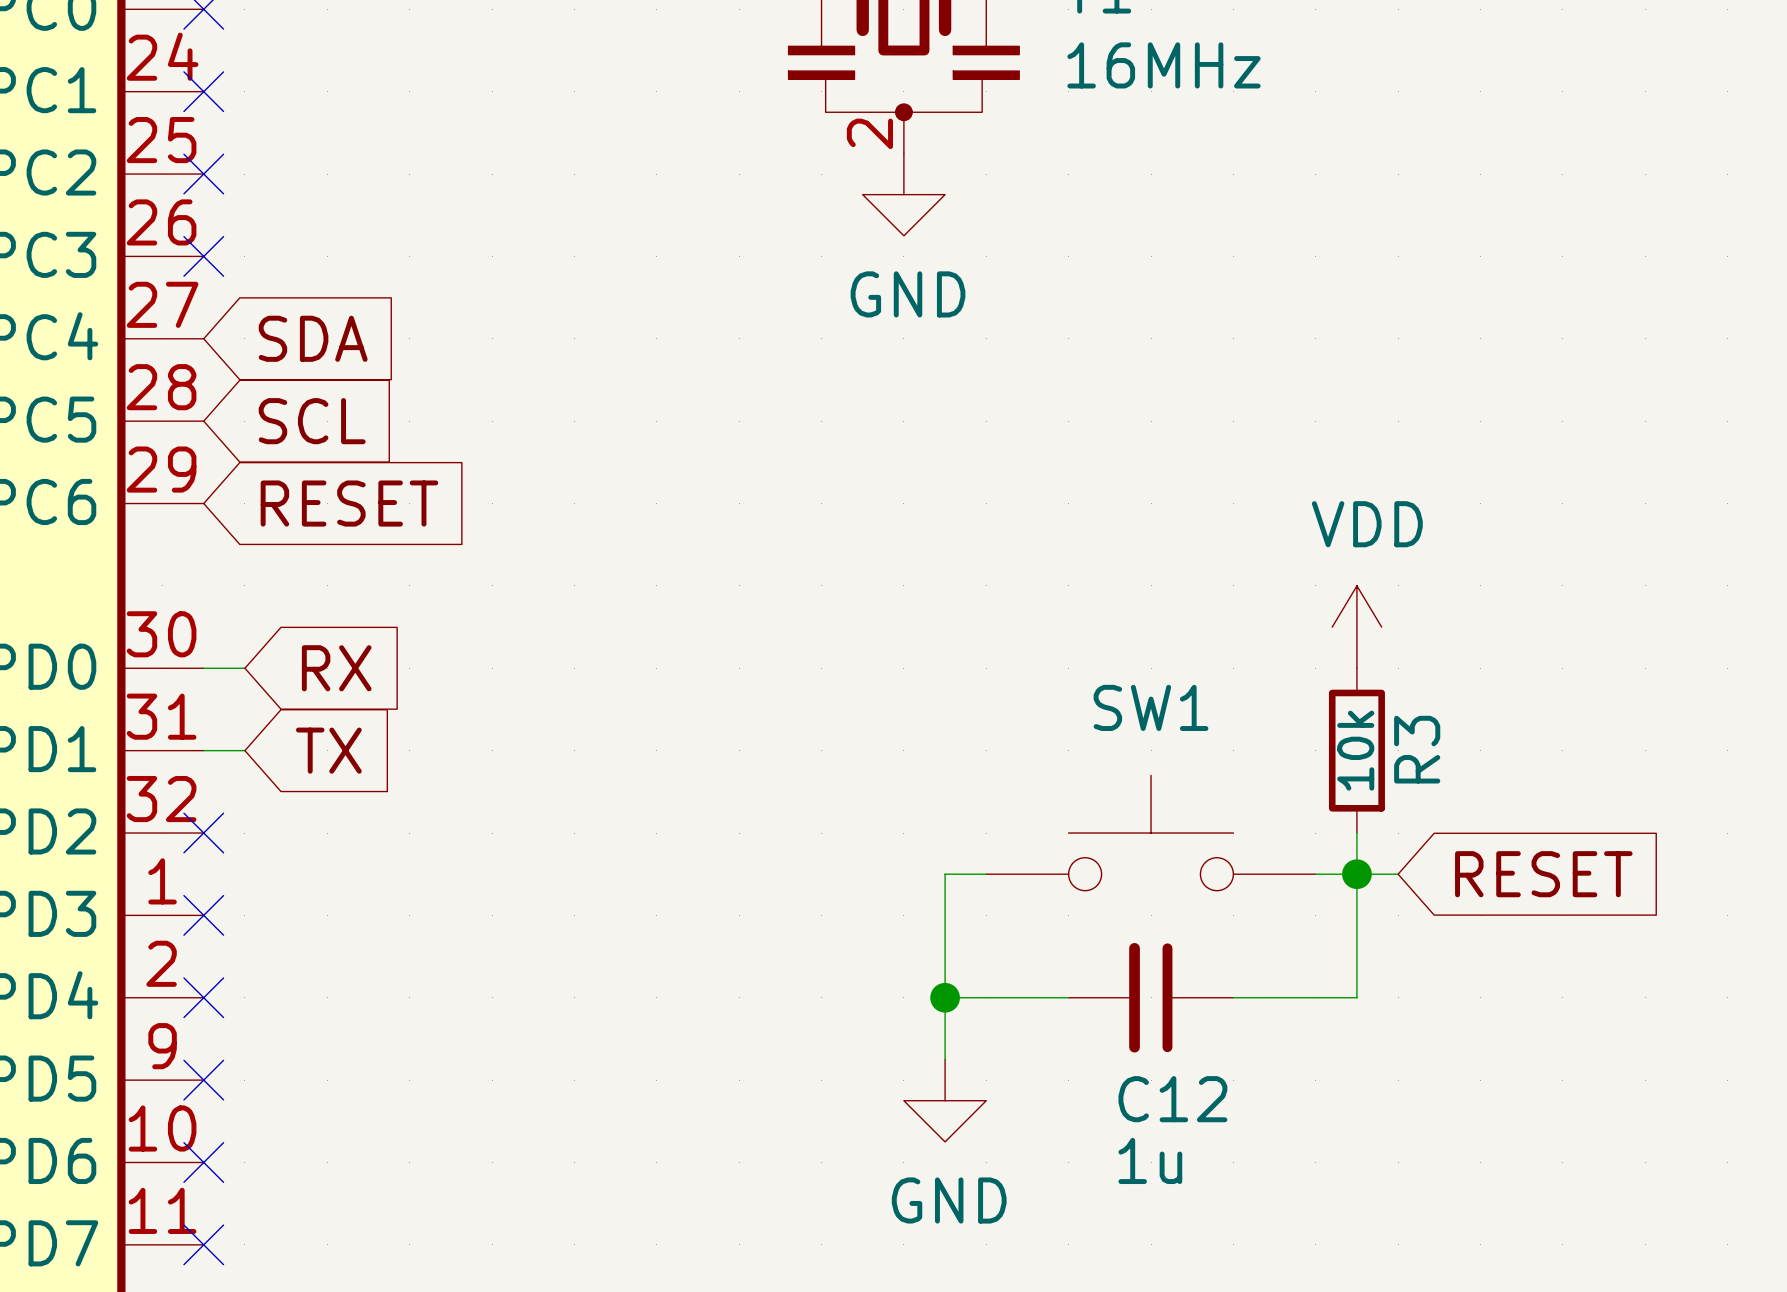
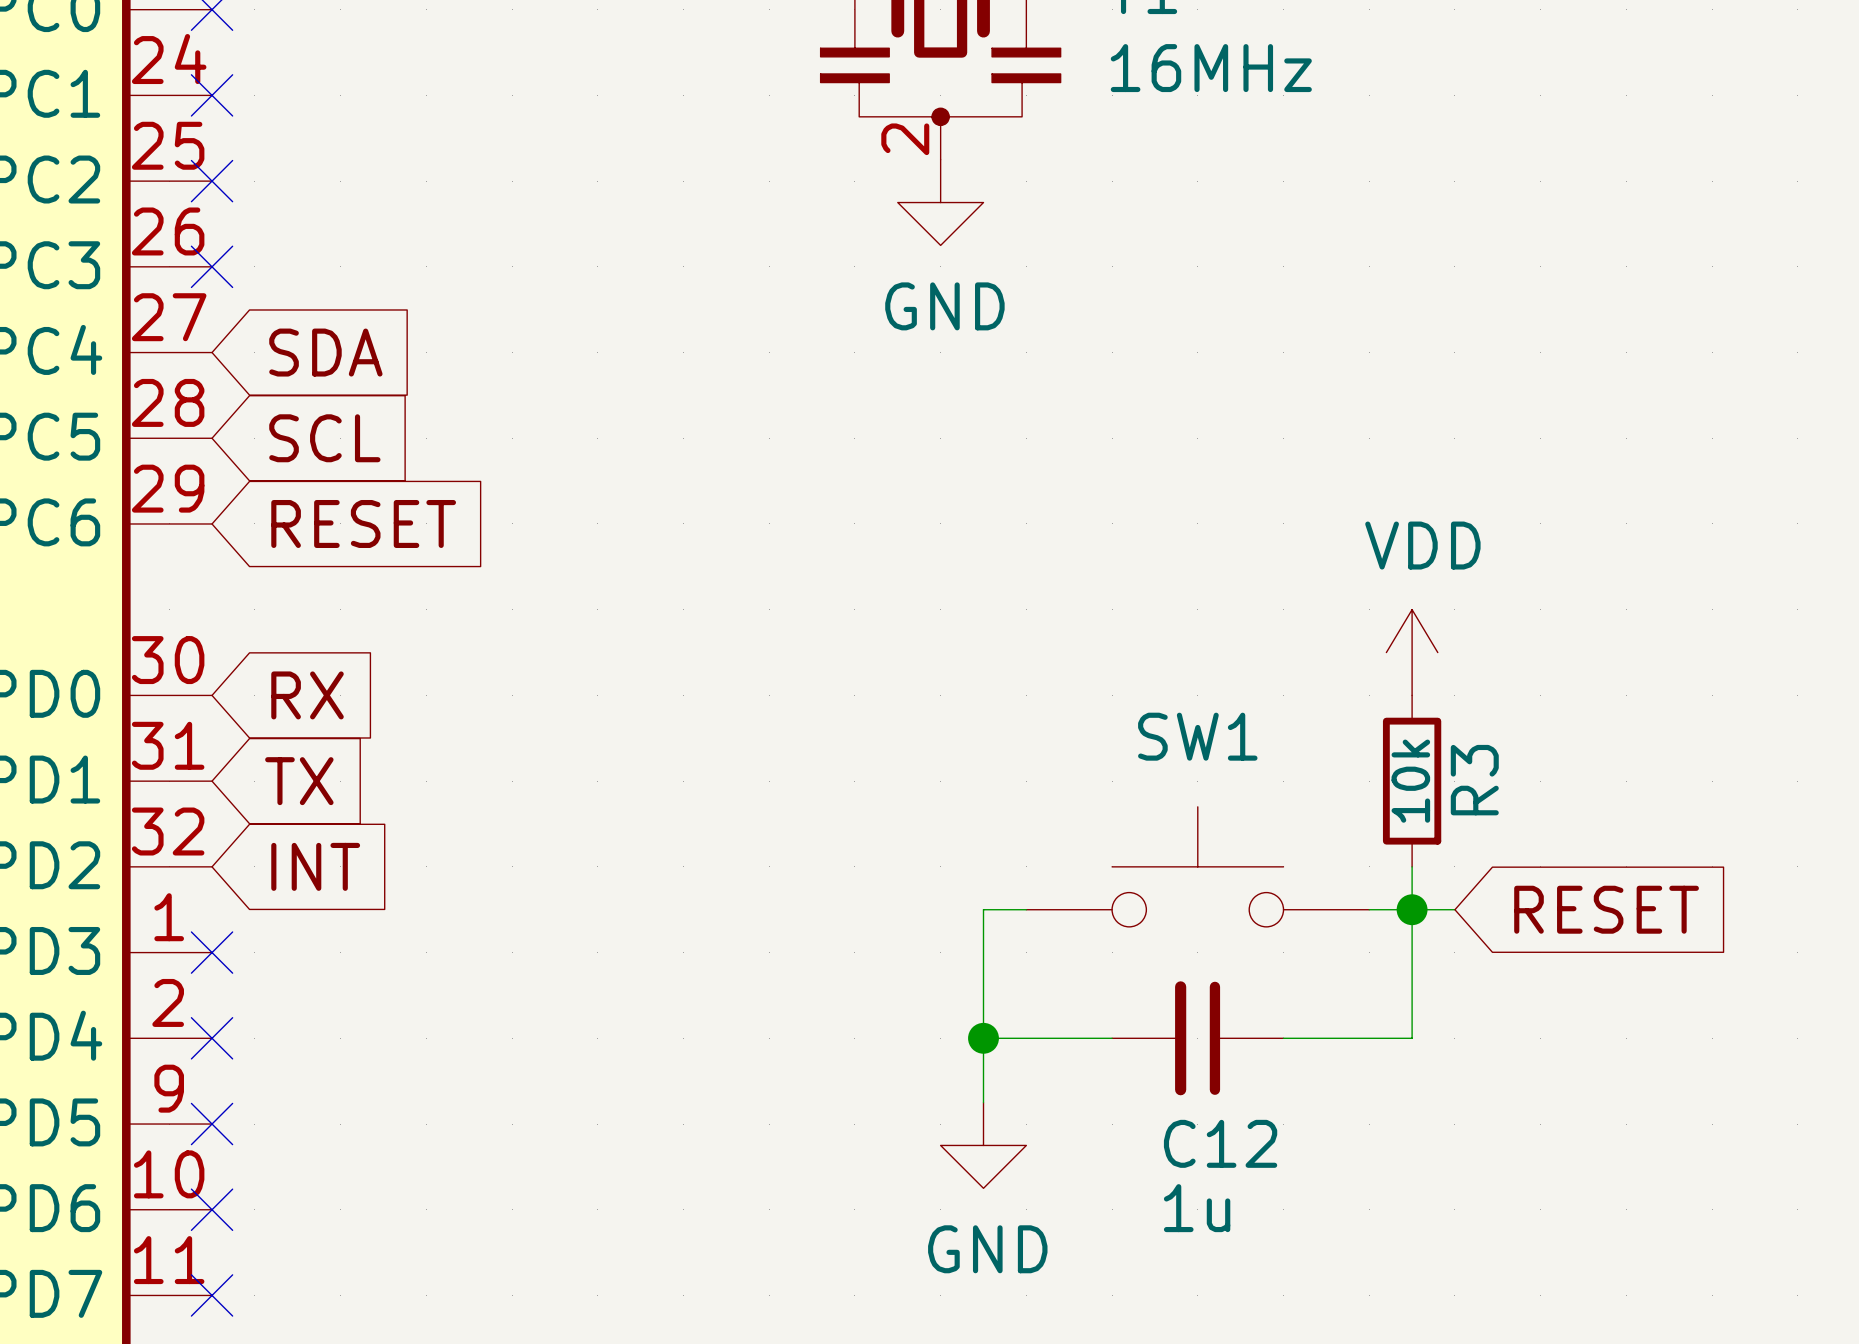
wire: (203, 668) (244, 668) -> none
global label position: RX (336, 668) -> RX (307, 695)
wire: (203, 750) (244, 750) -> none
global label position: TX (328, 750) -> TX (299, 781)
no-connect mark: (203, 833) -> none
global label: none -> INT (315, 866)

